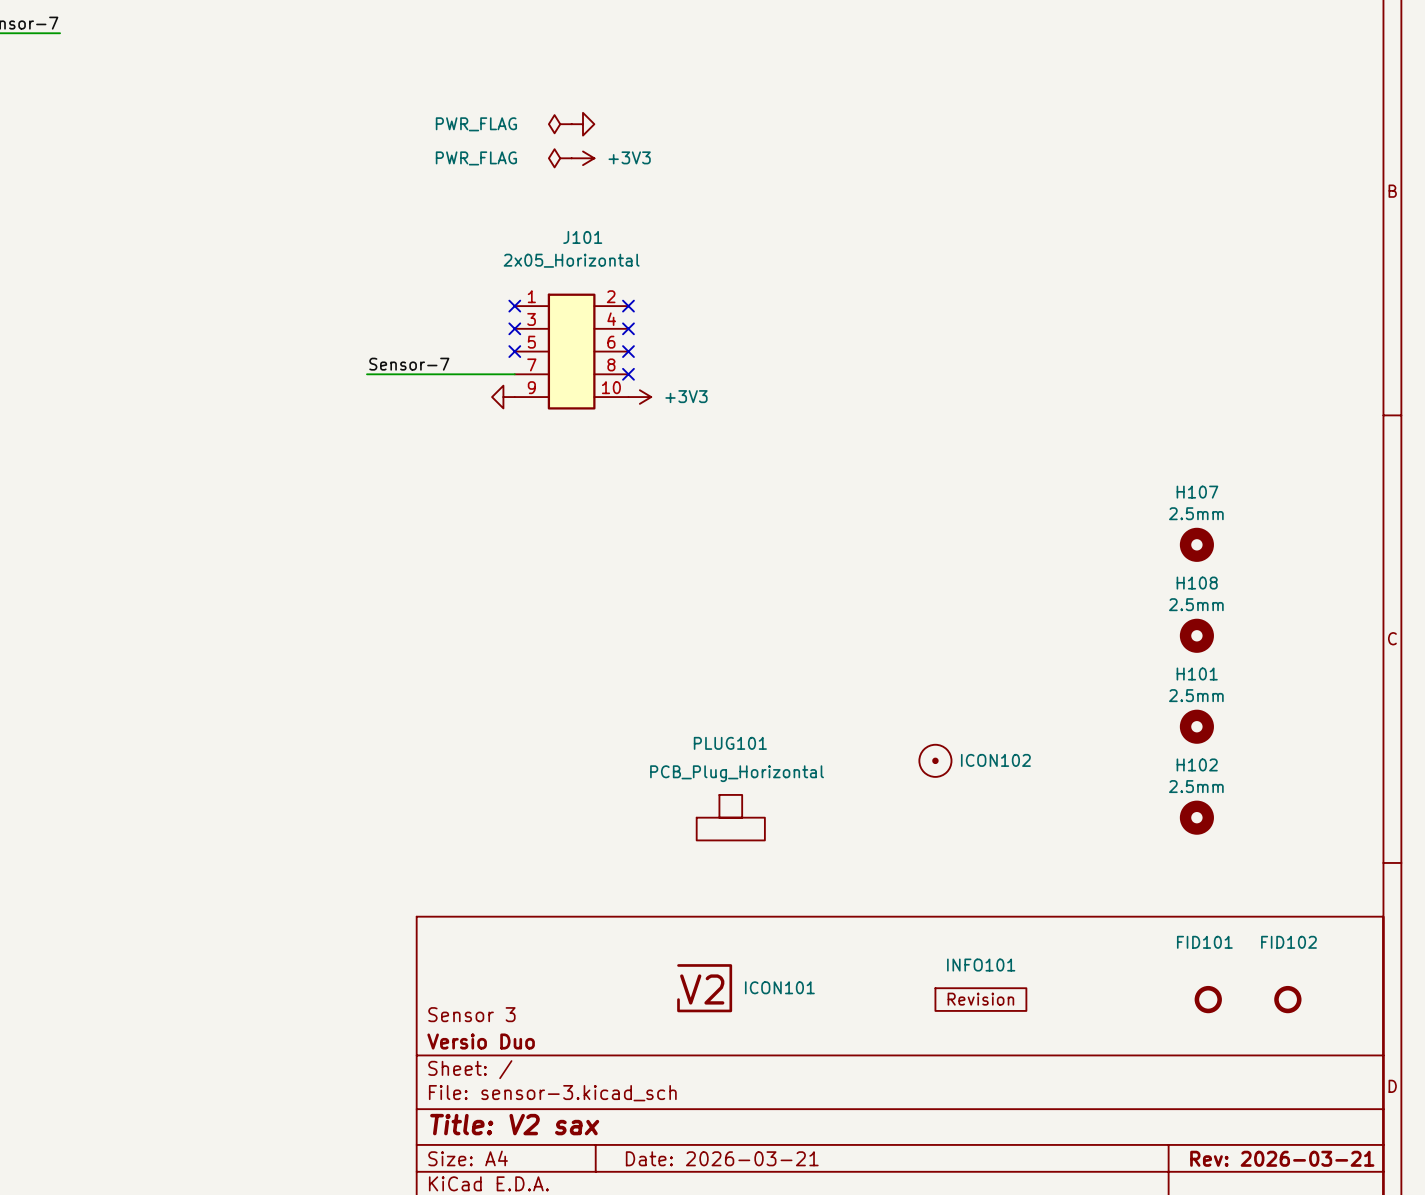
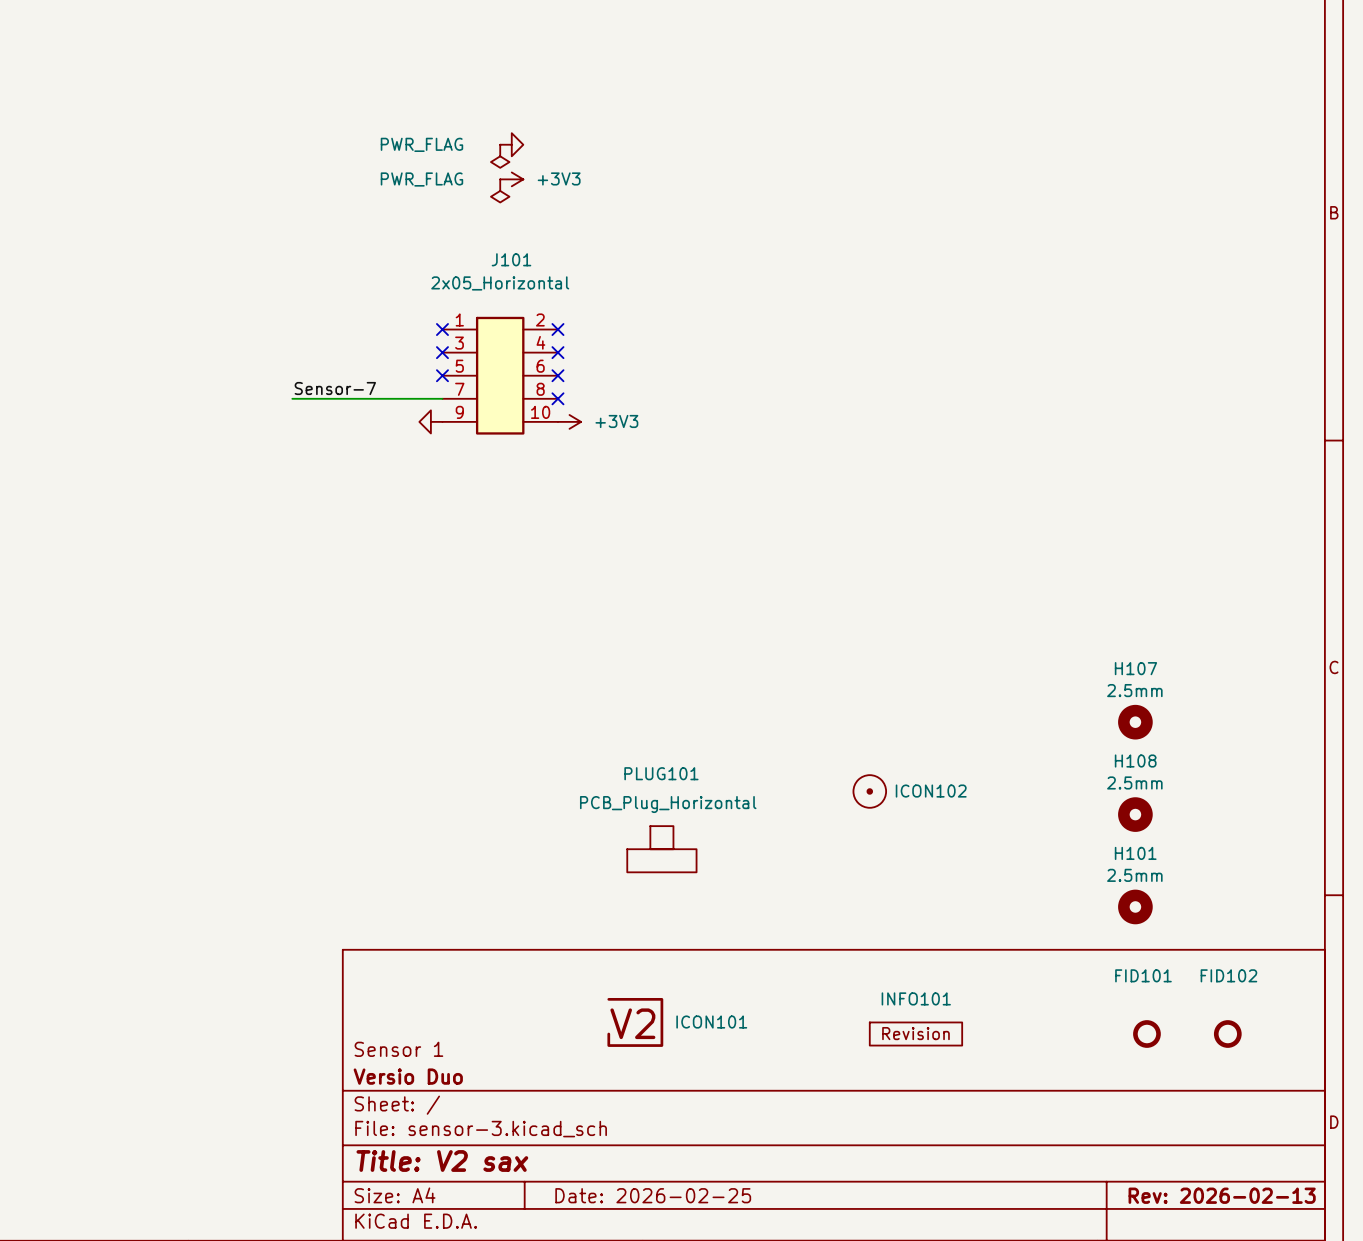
power symbol: PWR_FLAG (560, 124) -> none
power symbol: none -> PWR_FLAG (500, 156)
power symbol: PWR_FLAG (560, 158) -> none
power symbol: none -> PWR_FLAG (500, 190)
H107 position: (1196, 544) -> (1135, 722)
H108 position: (1196, 635) -> (1135, 814)
H101 position: (1196, 726) -> (1135, 906)
H102: 2.5mm (1196, 817) -> none
title block: Sensor 3 (471, 1014) -> Sensor 1 (398, 1049)
title block: Date: 2026-03-21 (722, 1158) -> Date: 2026-02-25 (653, 1195)
title block: Rev: 2026-03-21 (1282, 1158) -> Rev: 2026-02-13 (1222, 1195)

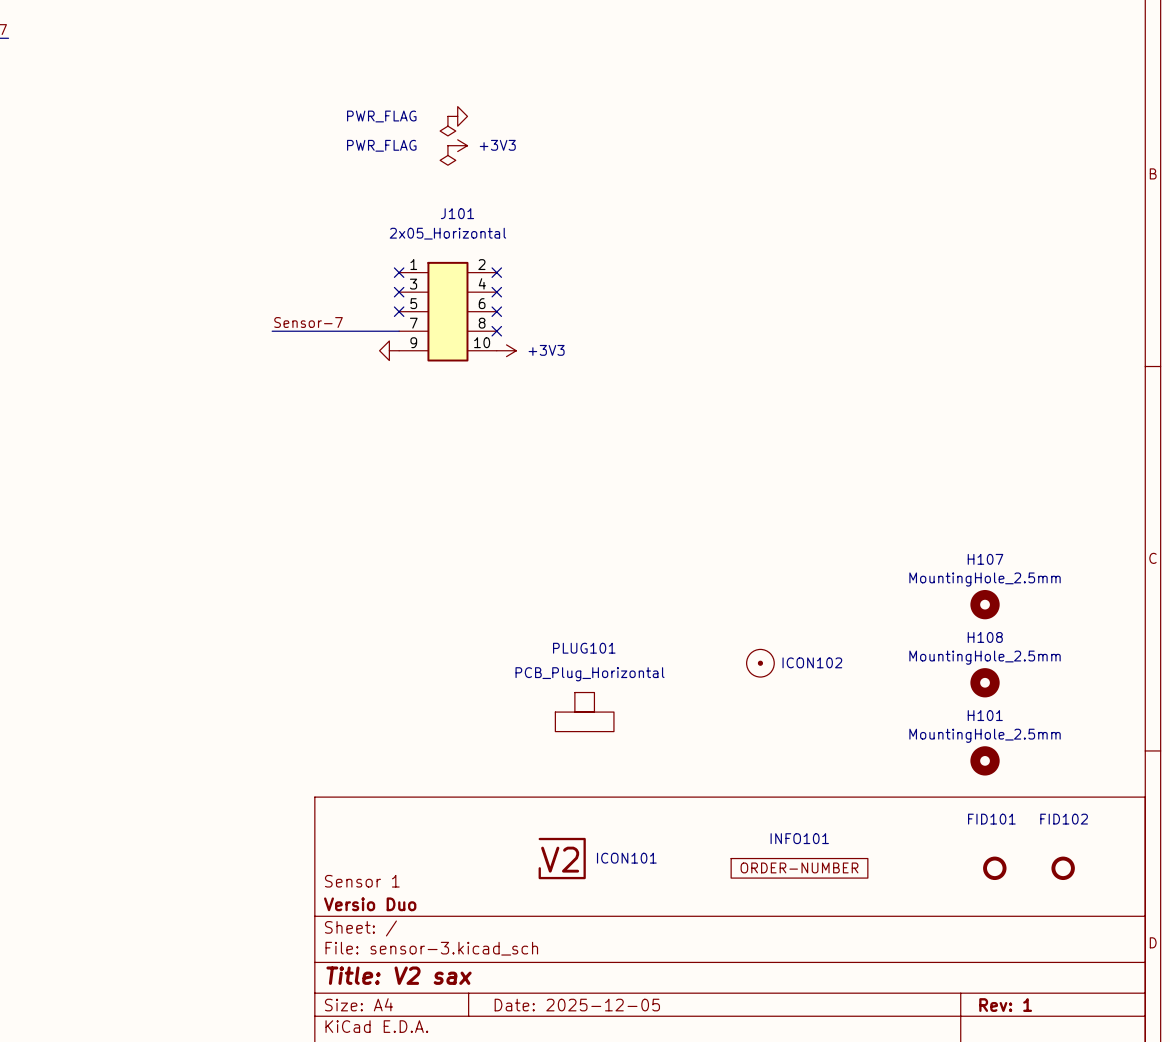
H107 value: 2.5mm (1134, 690) -> MountingHole_2.5mm (985, 579)
H108 value: 2.5mm (1134, 782) -> MountingHole_2.5mm (985, 657)
H101 value: 2.5mm (1134, 875) -> MountingHole_2.5mm (985, 735)
INFO101 symbol: [869, 1022, 963, 1046] -> [731, 858, 868, 879]
title block: Date: 2026-02-25 (653, 1195) -> Date: 2025-12-05 (577, 1005)
title block: Rev: 2026-02-13 (1222, 1195) -> Rev: 1 (1005, 1005)

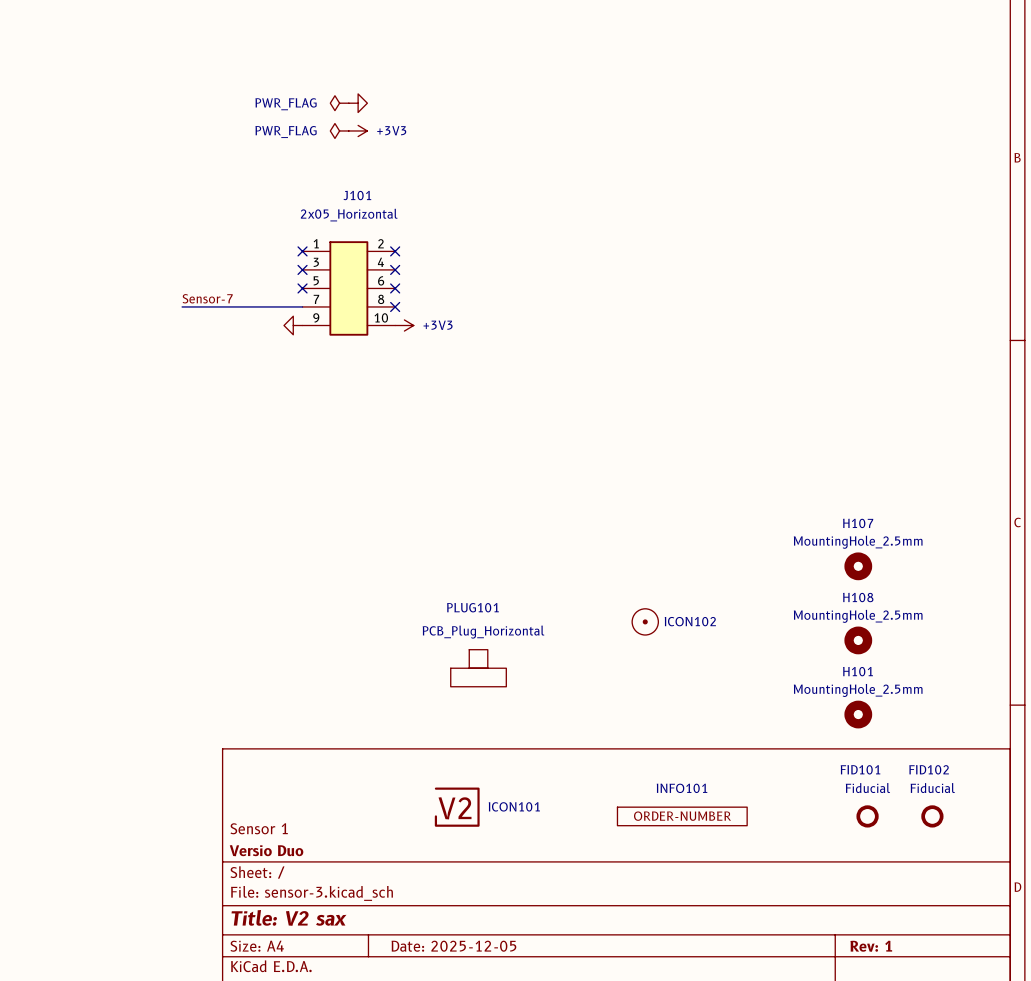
power symbol: none -> PWR_FLAG (339, 103)
power symbol: PWR_FLAG (447, 126) -> none
power symbol: none -> PWR_FLAG (339, 130)
power symbol: PWR_FLAG (447, 155) -> none
FID101 value: none -> Fiducial (867, 788)
FID102 value: none -> Fiducial (932, 788)

